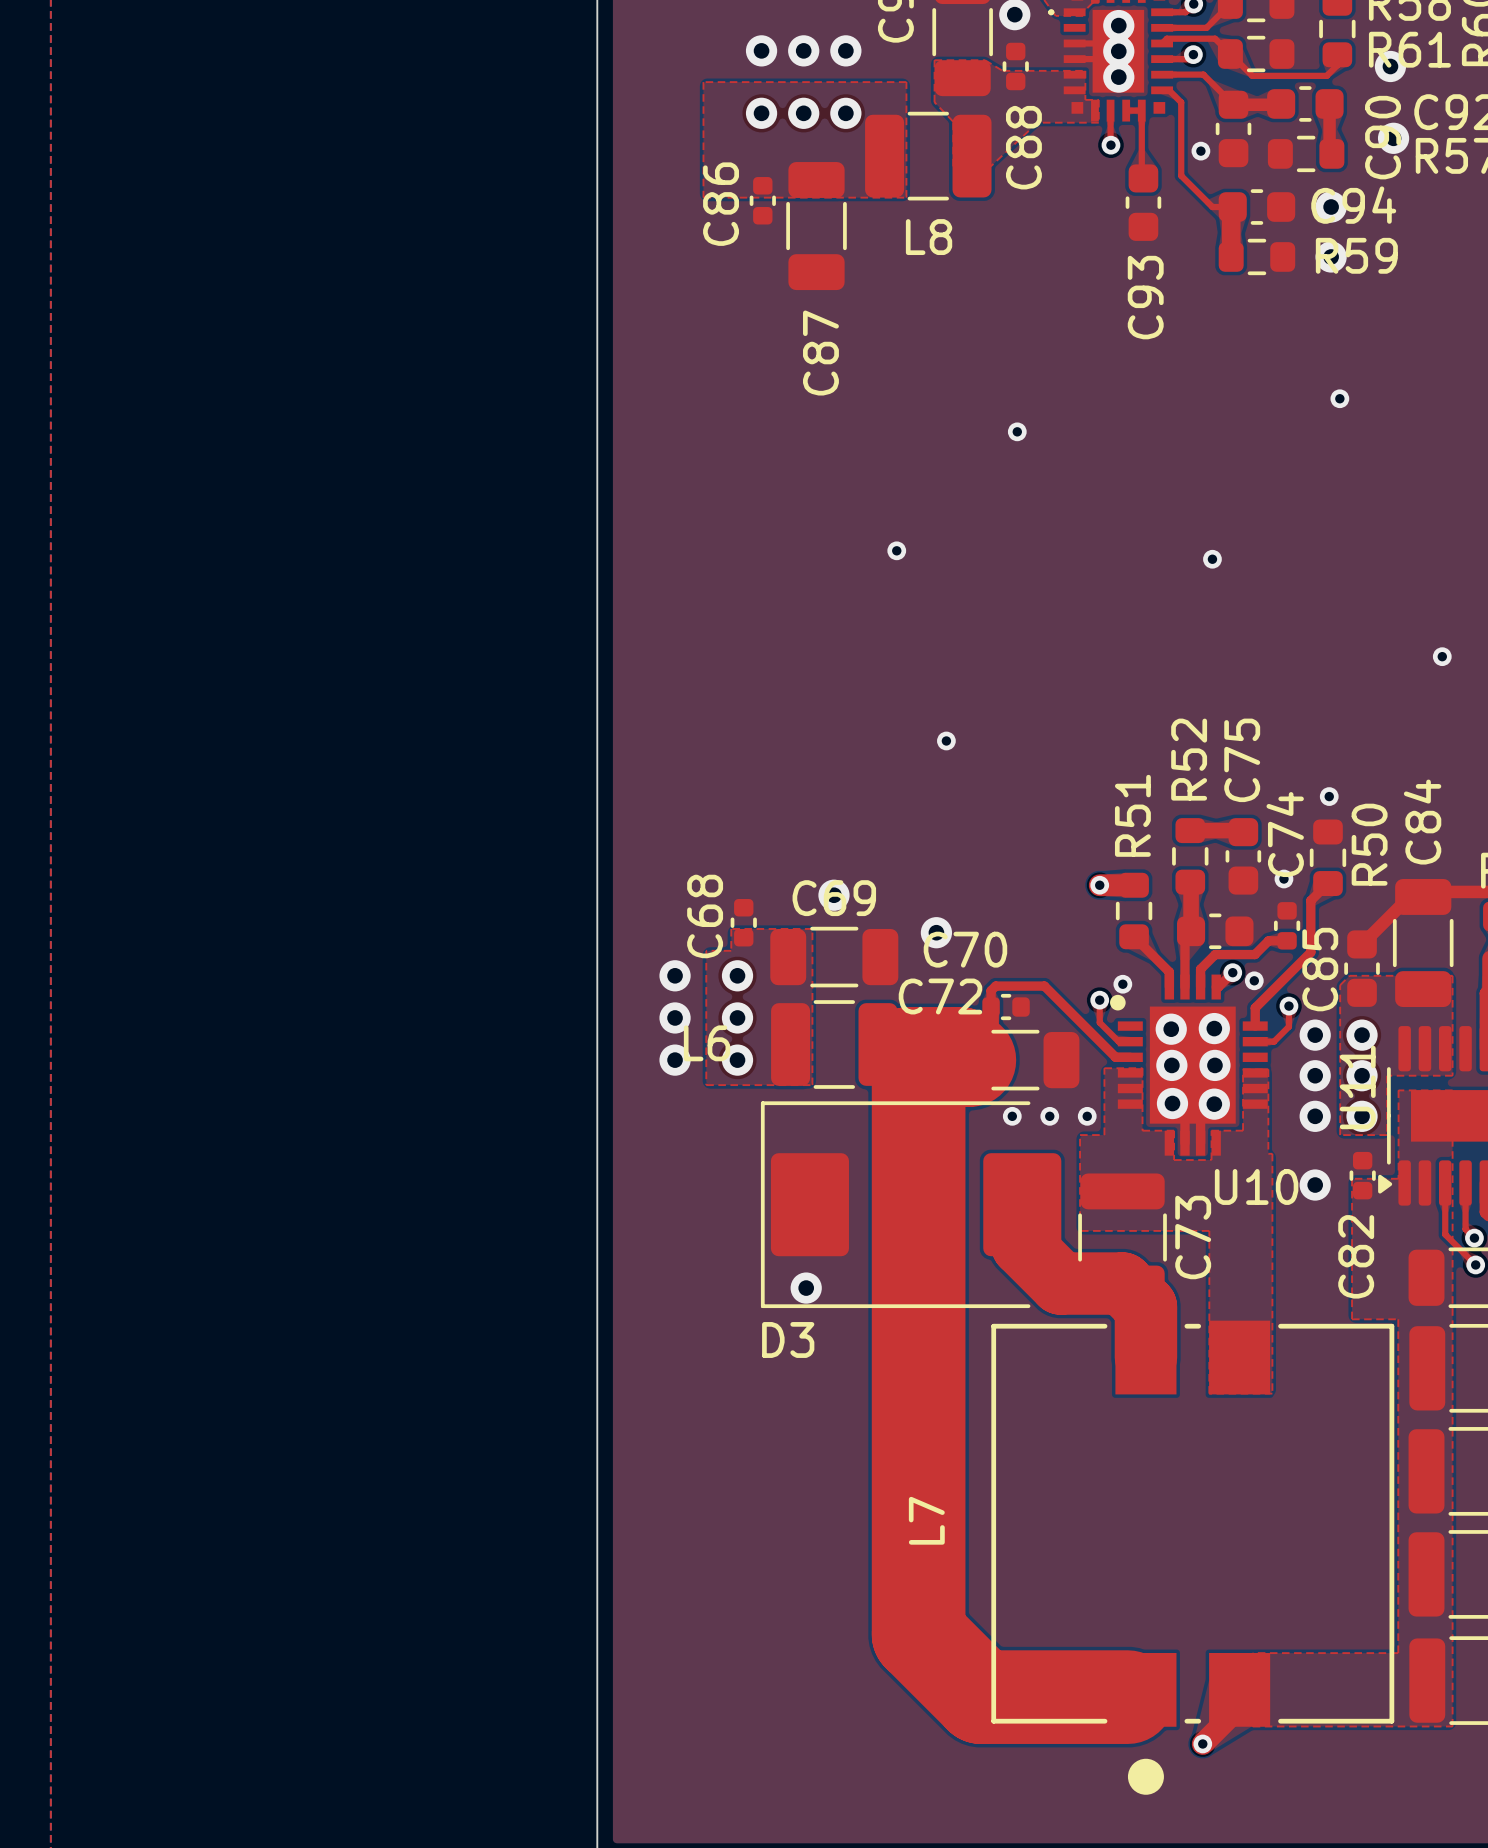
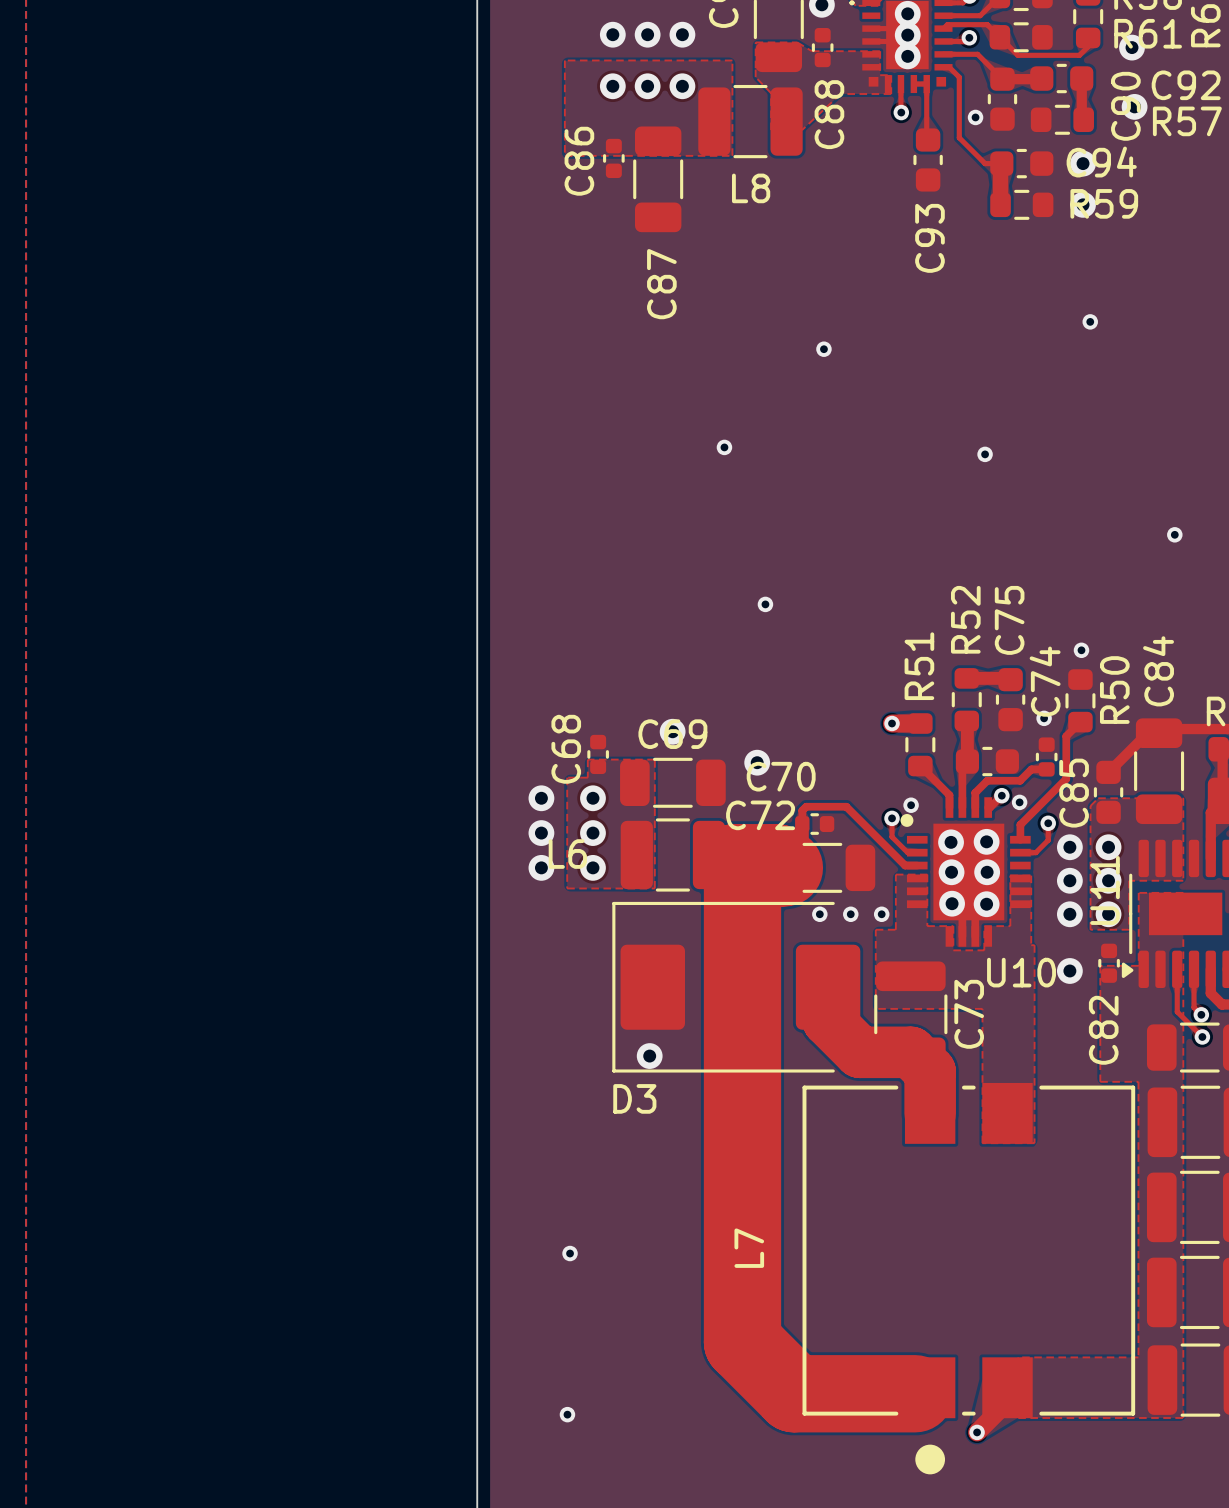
via: none -> (570, 1253)
via: none -> (567, 1414)

